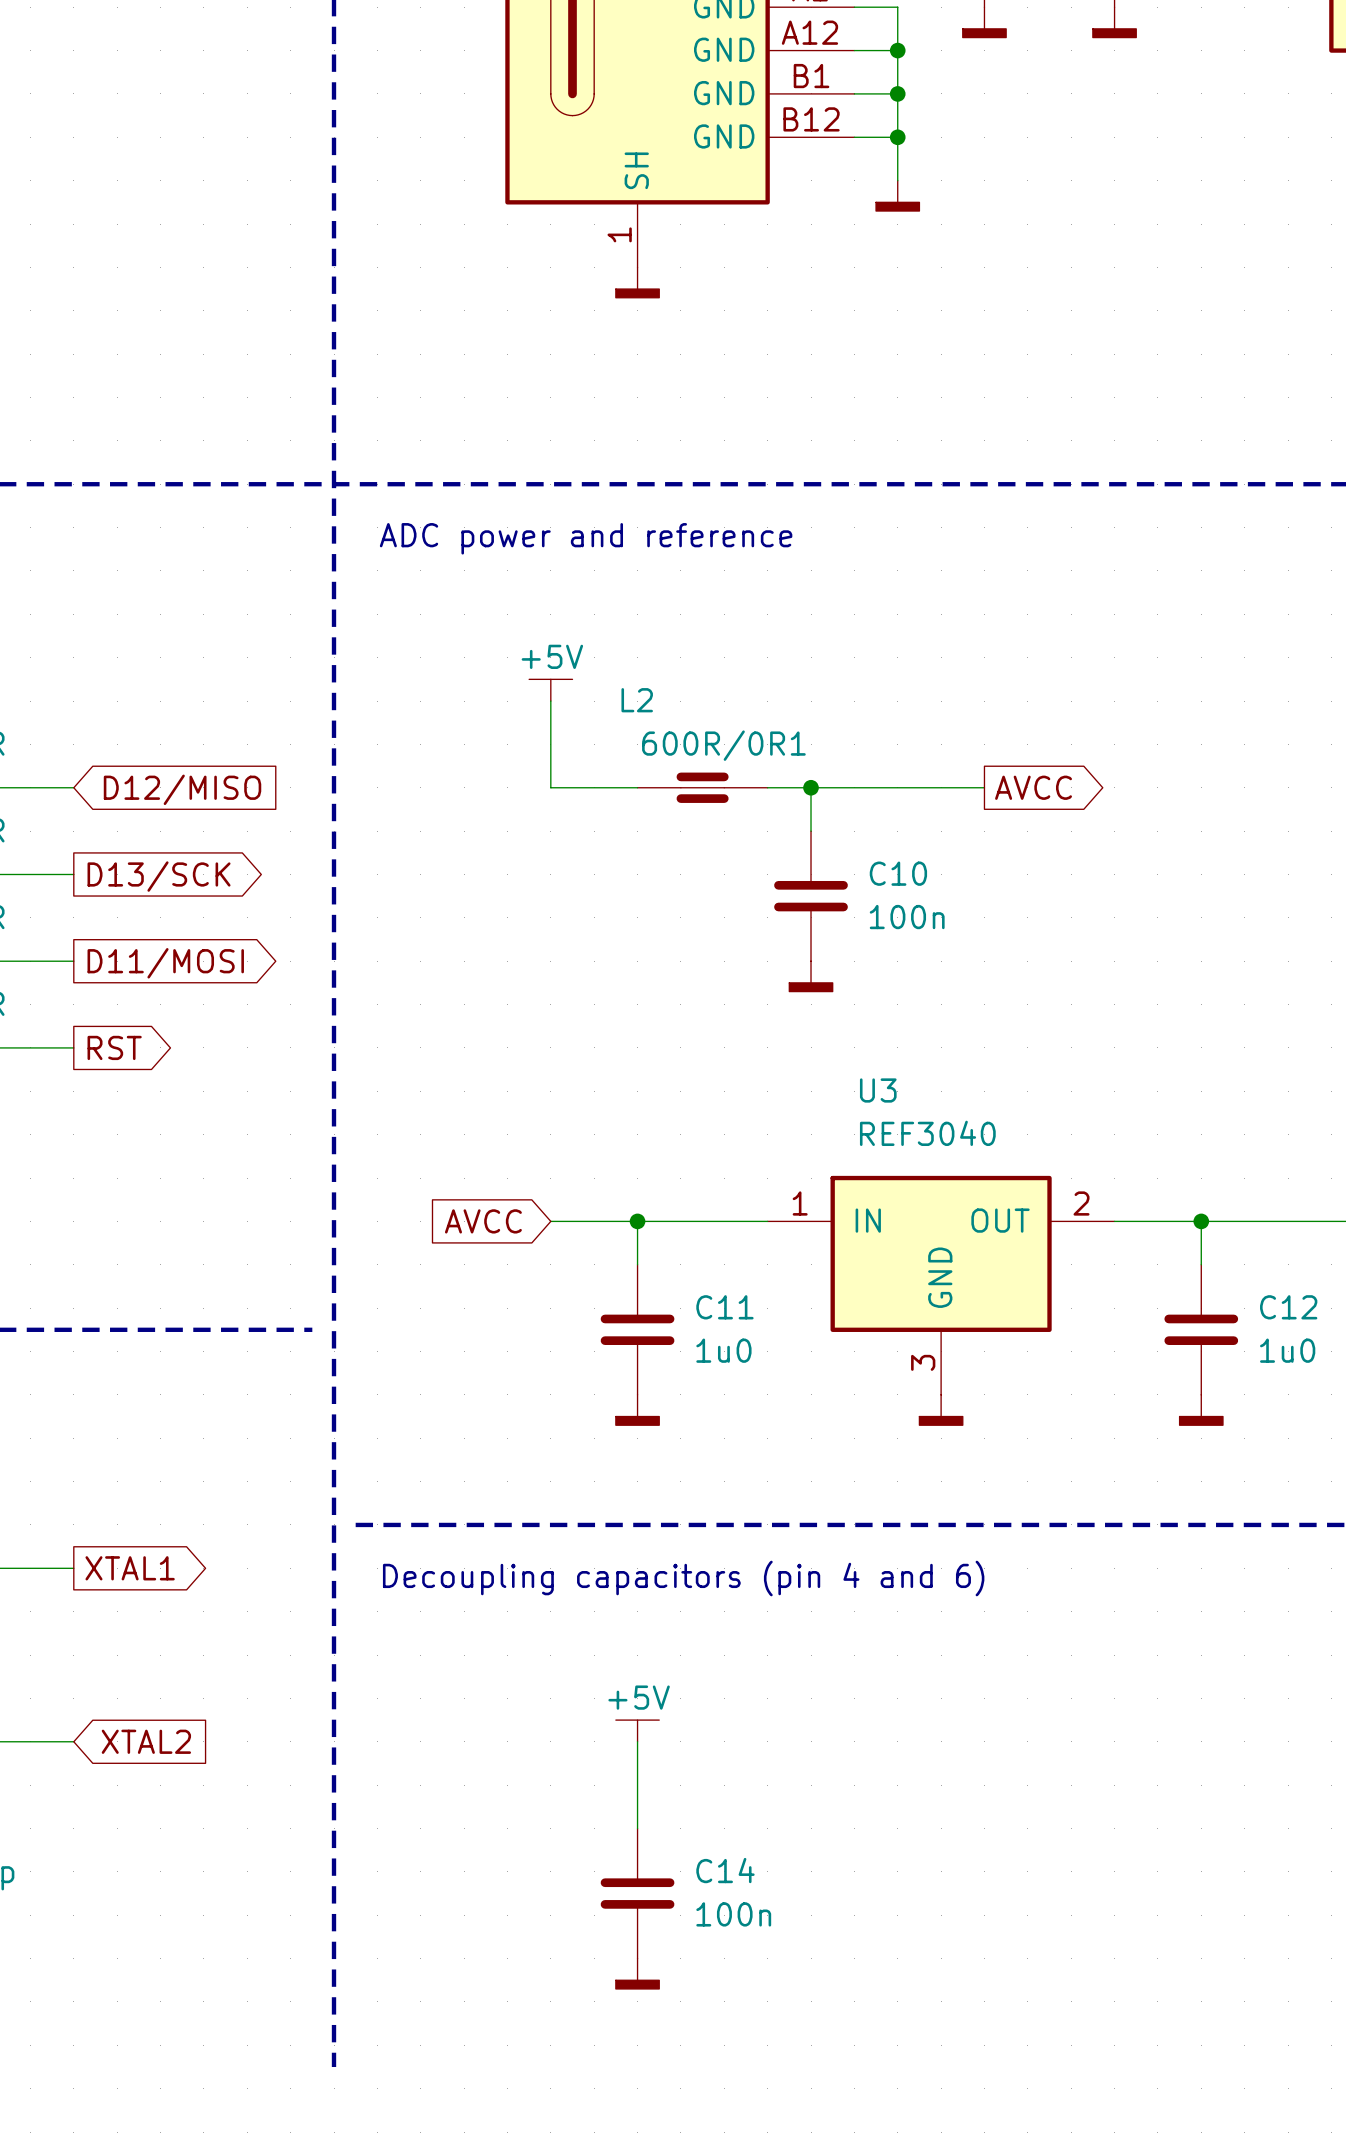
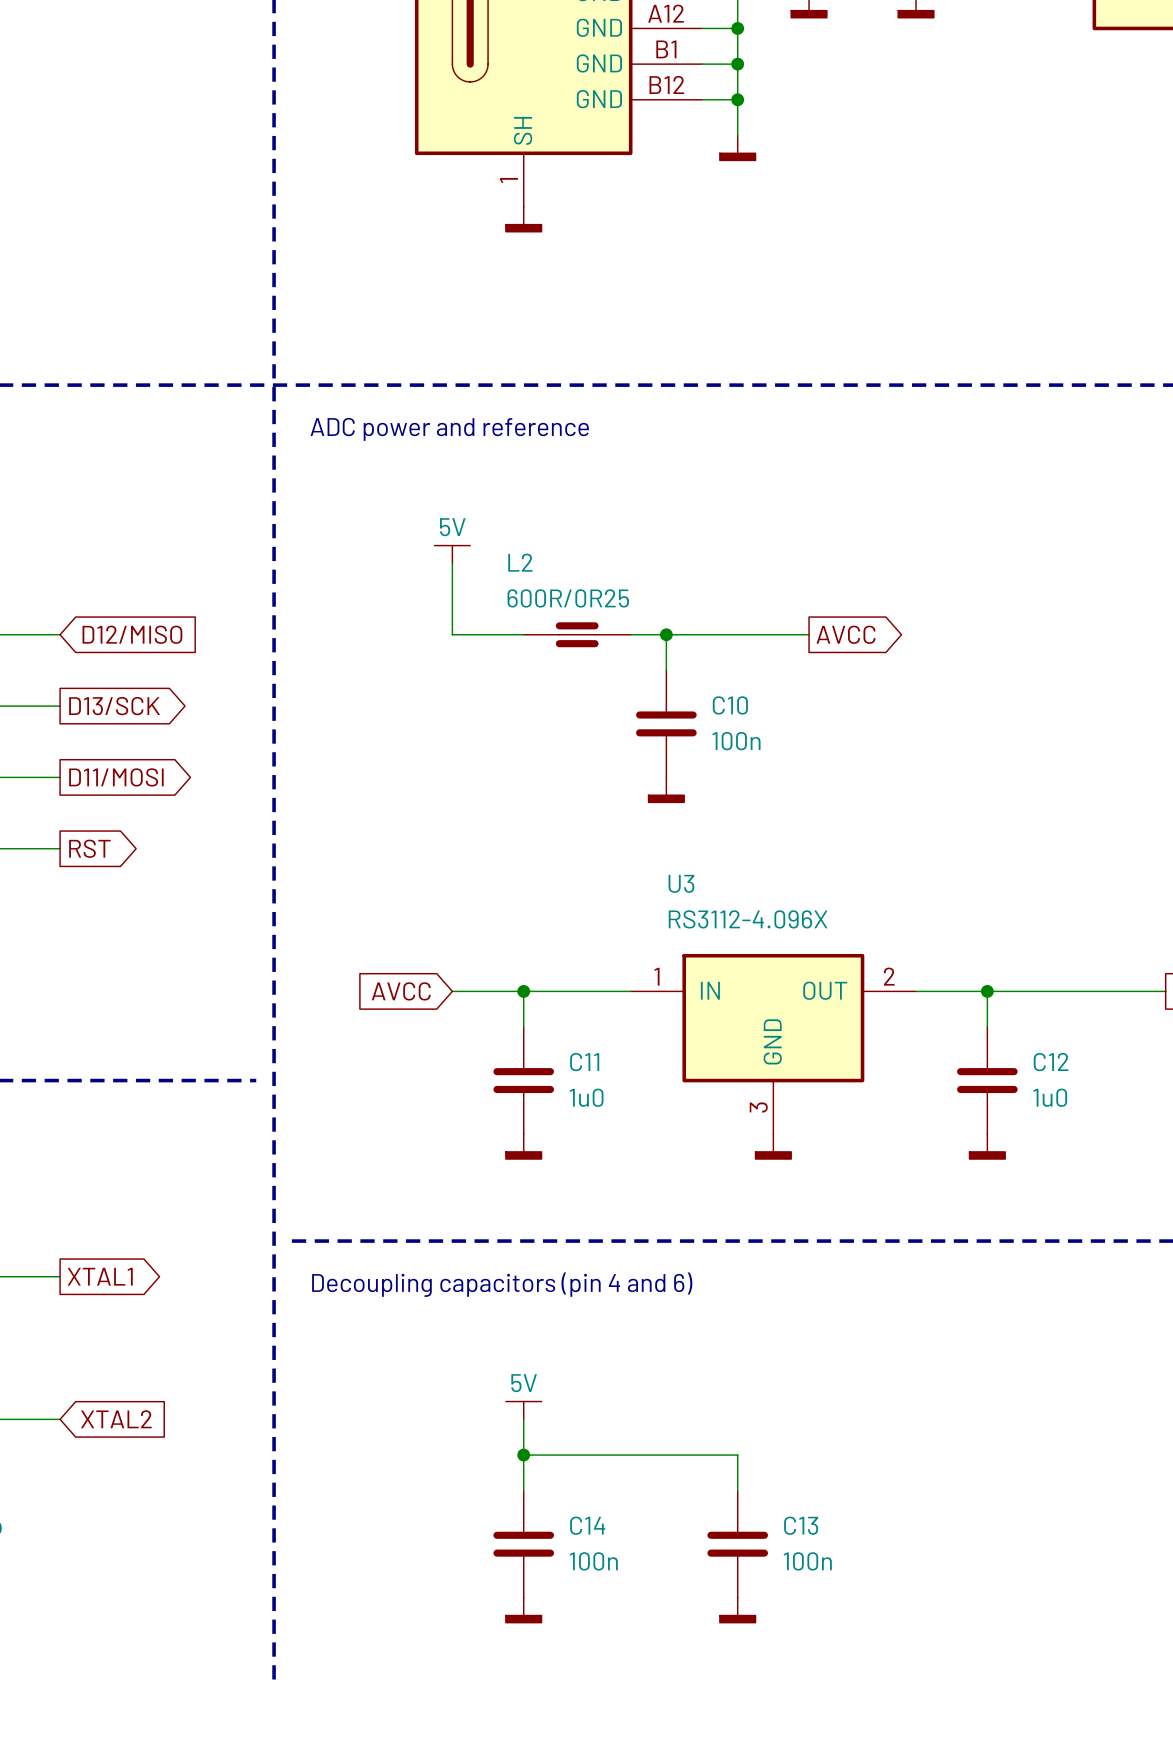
power symbol: +5V (550, 690) -> 5V (452, 554)
L2 value: 600R/0R1 (723, 745) -> 600R/0R25 (568, 598)
U3 name position: U3 (878, 1090) -> U3 (681, 883)
U3 value: REF3040 (927, 1133) -> RS3112-4.096X (748, 919)
power symbol: +5V (637, 1730) -> 5V (523, 1410)
wire: none -> (523, 1455) (737, 1455) (737, 1490)
junction: none -> (523, 1455)
C13: none -> 100n (737, 1544)
power symbol: none -> (737, 1610)

